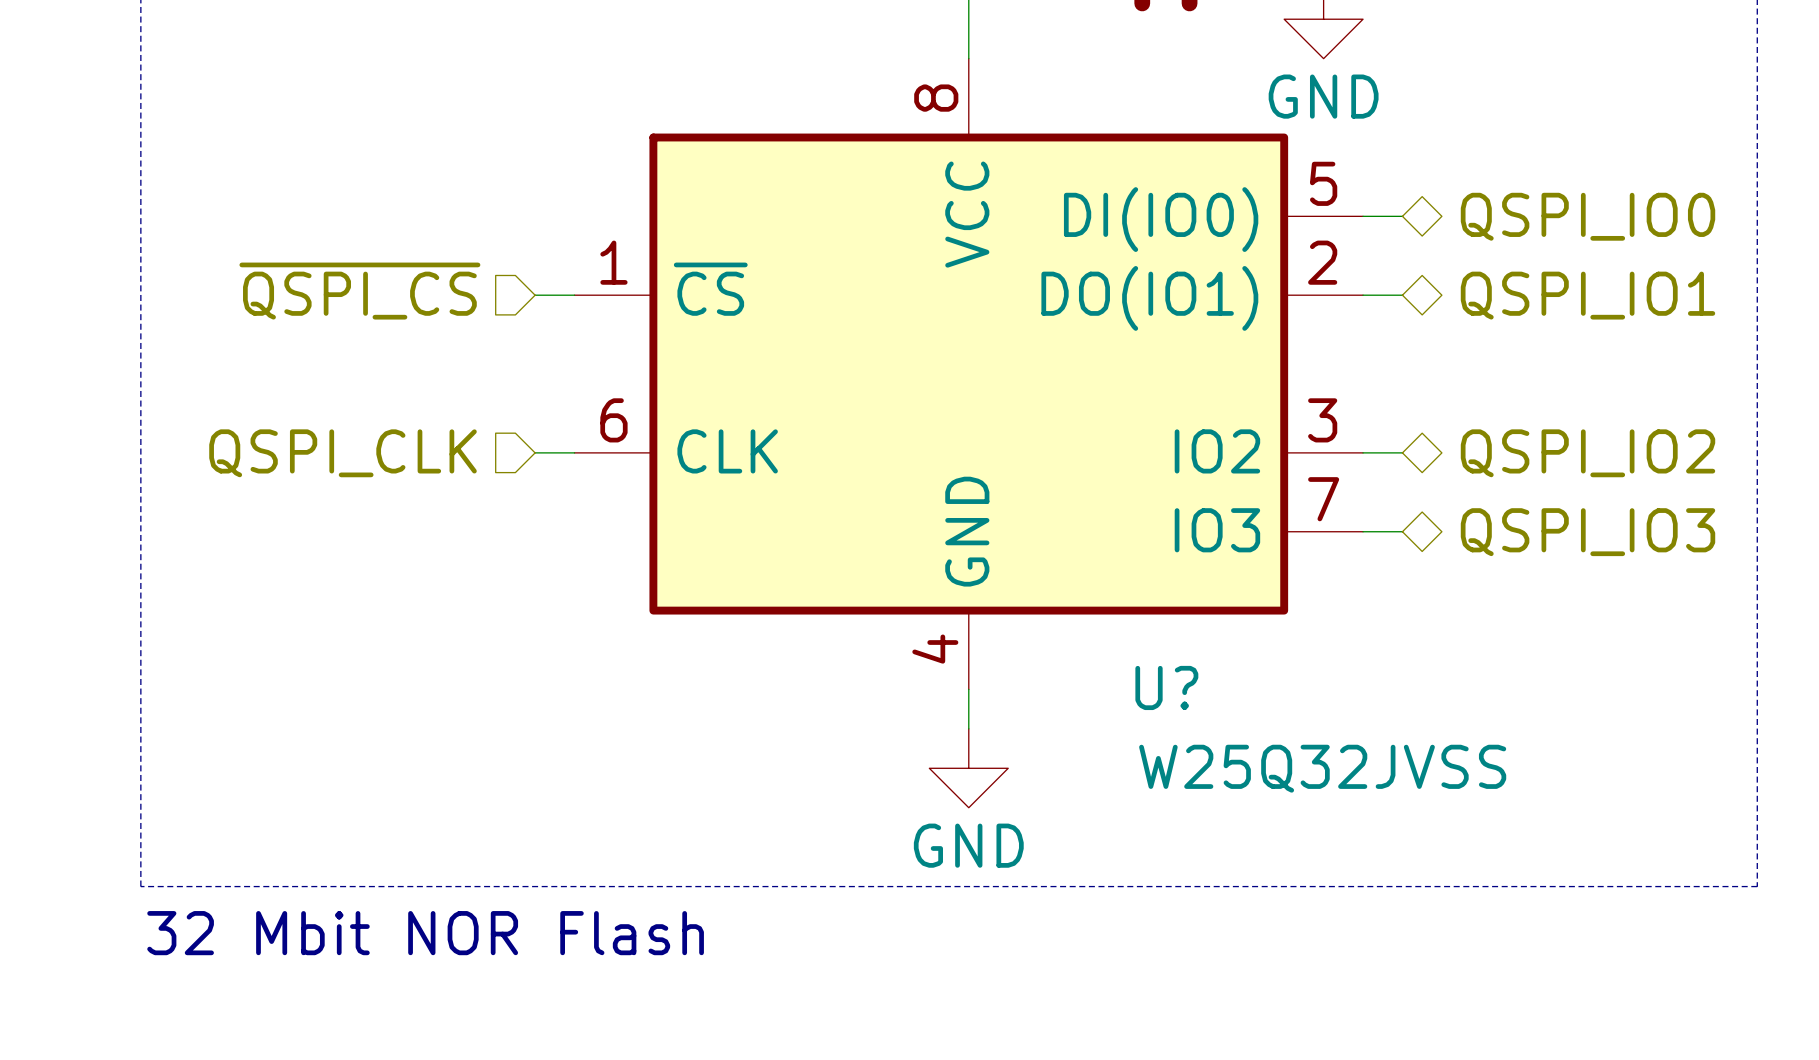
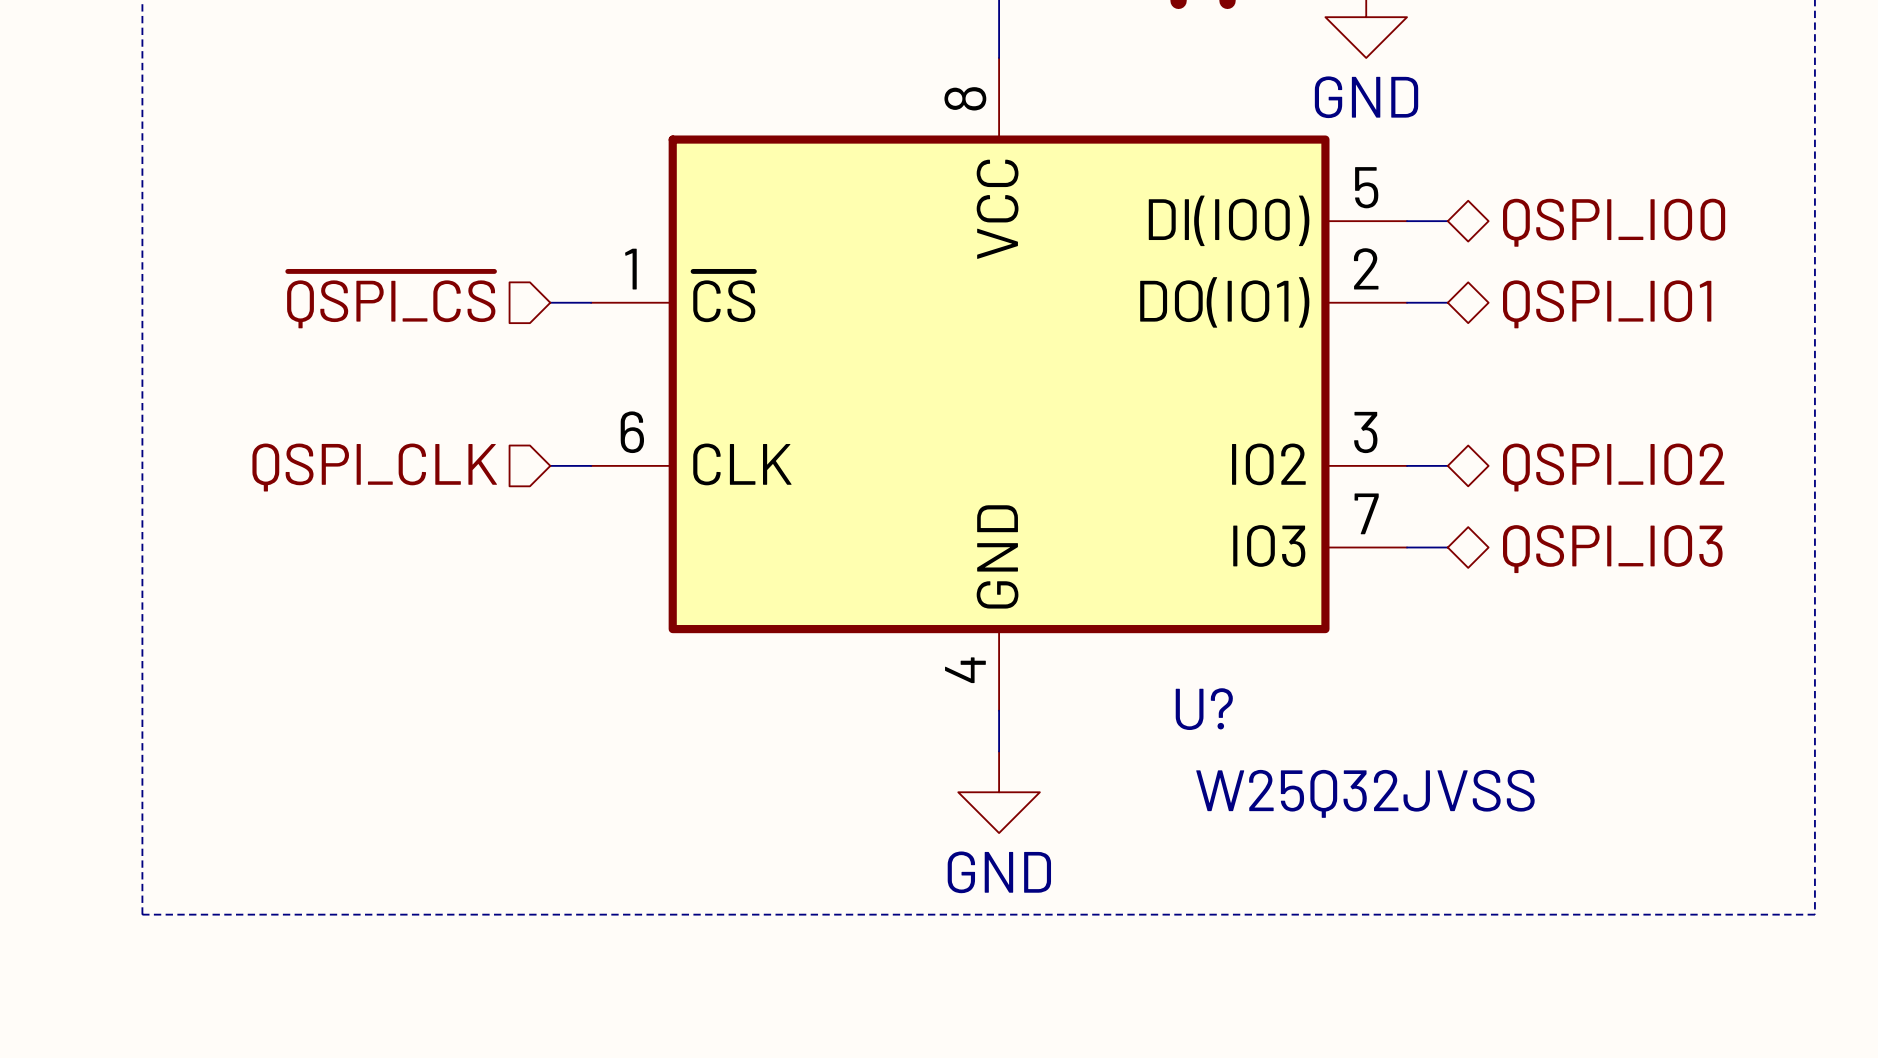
text: 32 Mbit NOR Flash (425, 933) -> none

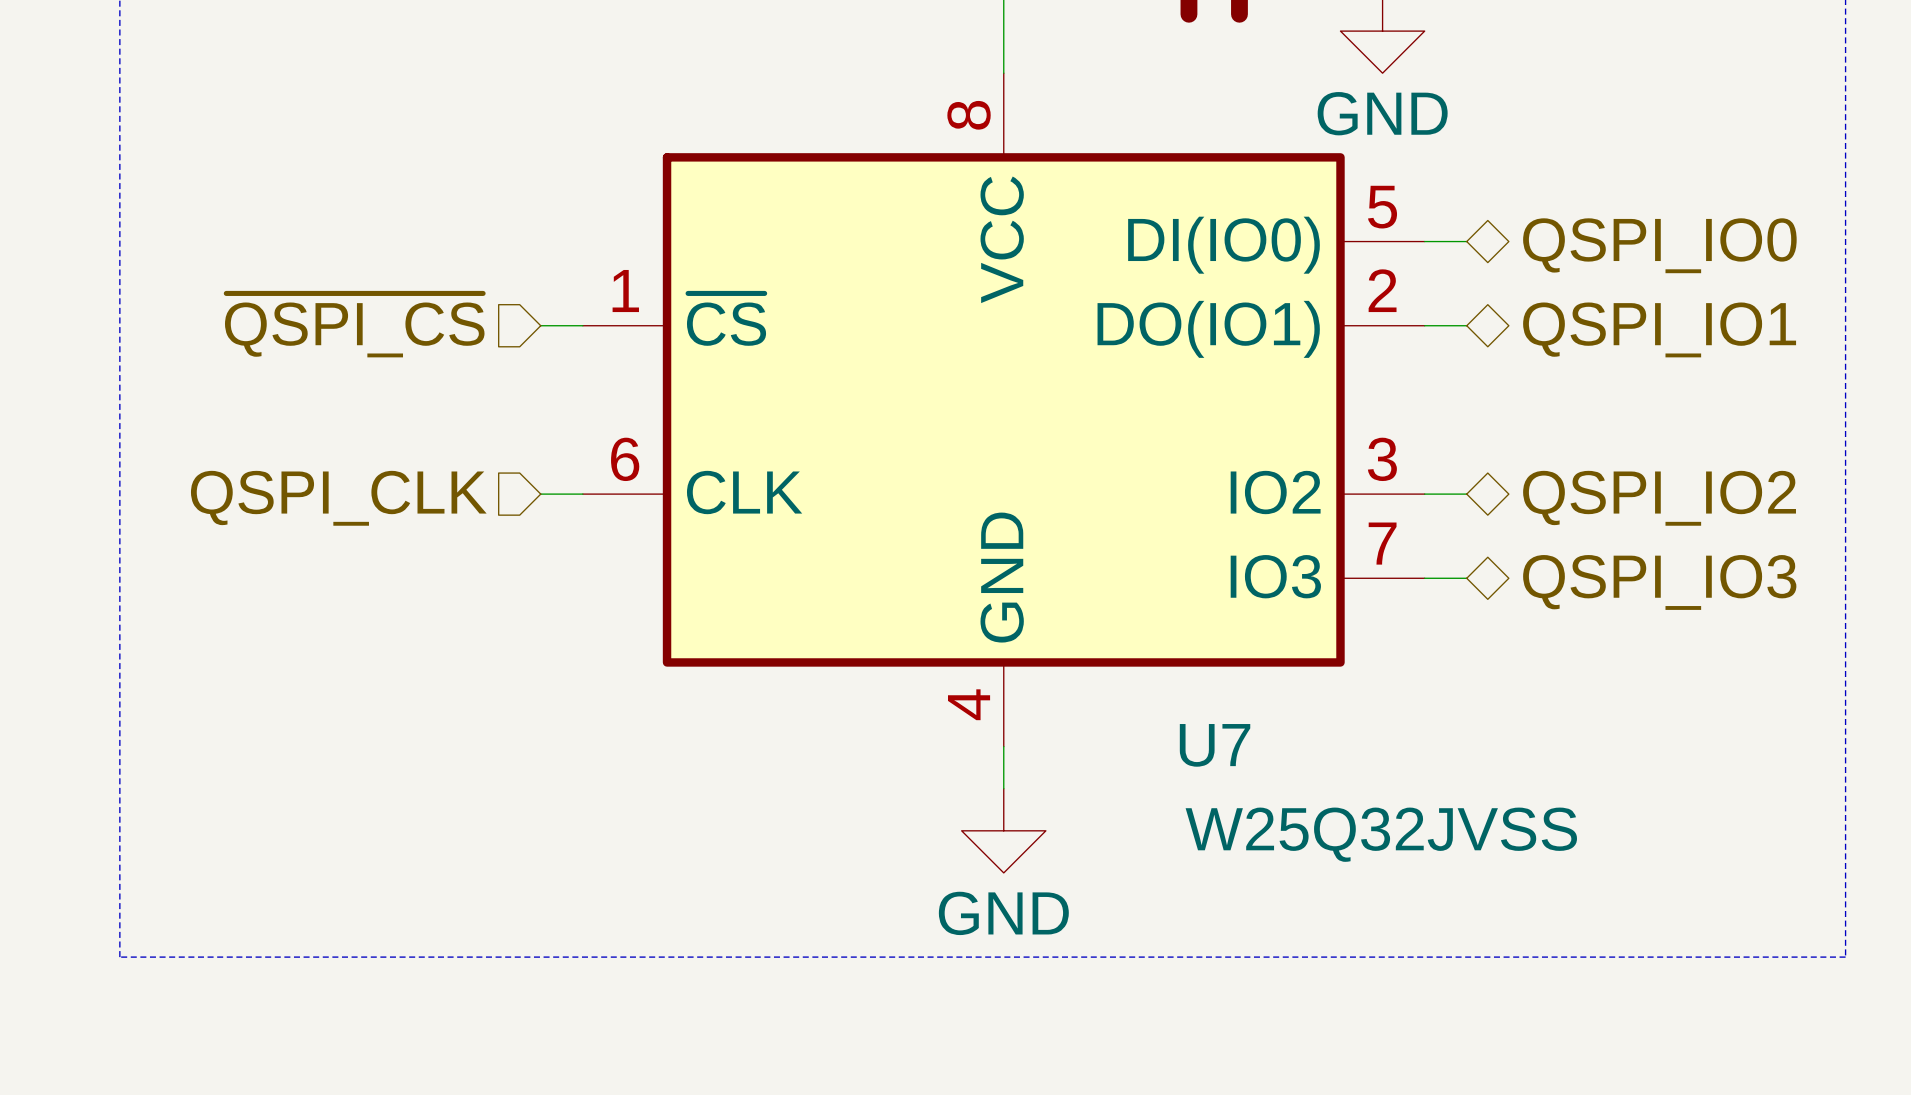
U? name: U? (1204, 709) -> U7 (1215, 745)

